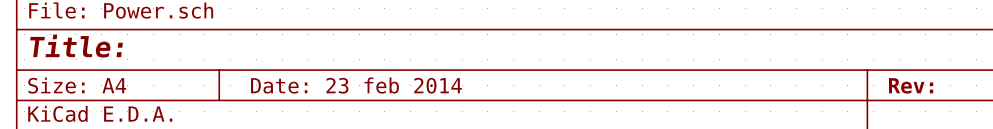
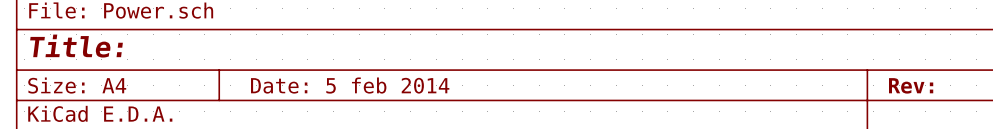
title block: Date: 23 feb 2014 (356, 85) -> Date: 5 feb 2014 (350, 85)

